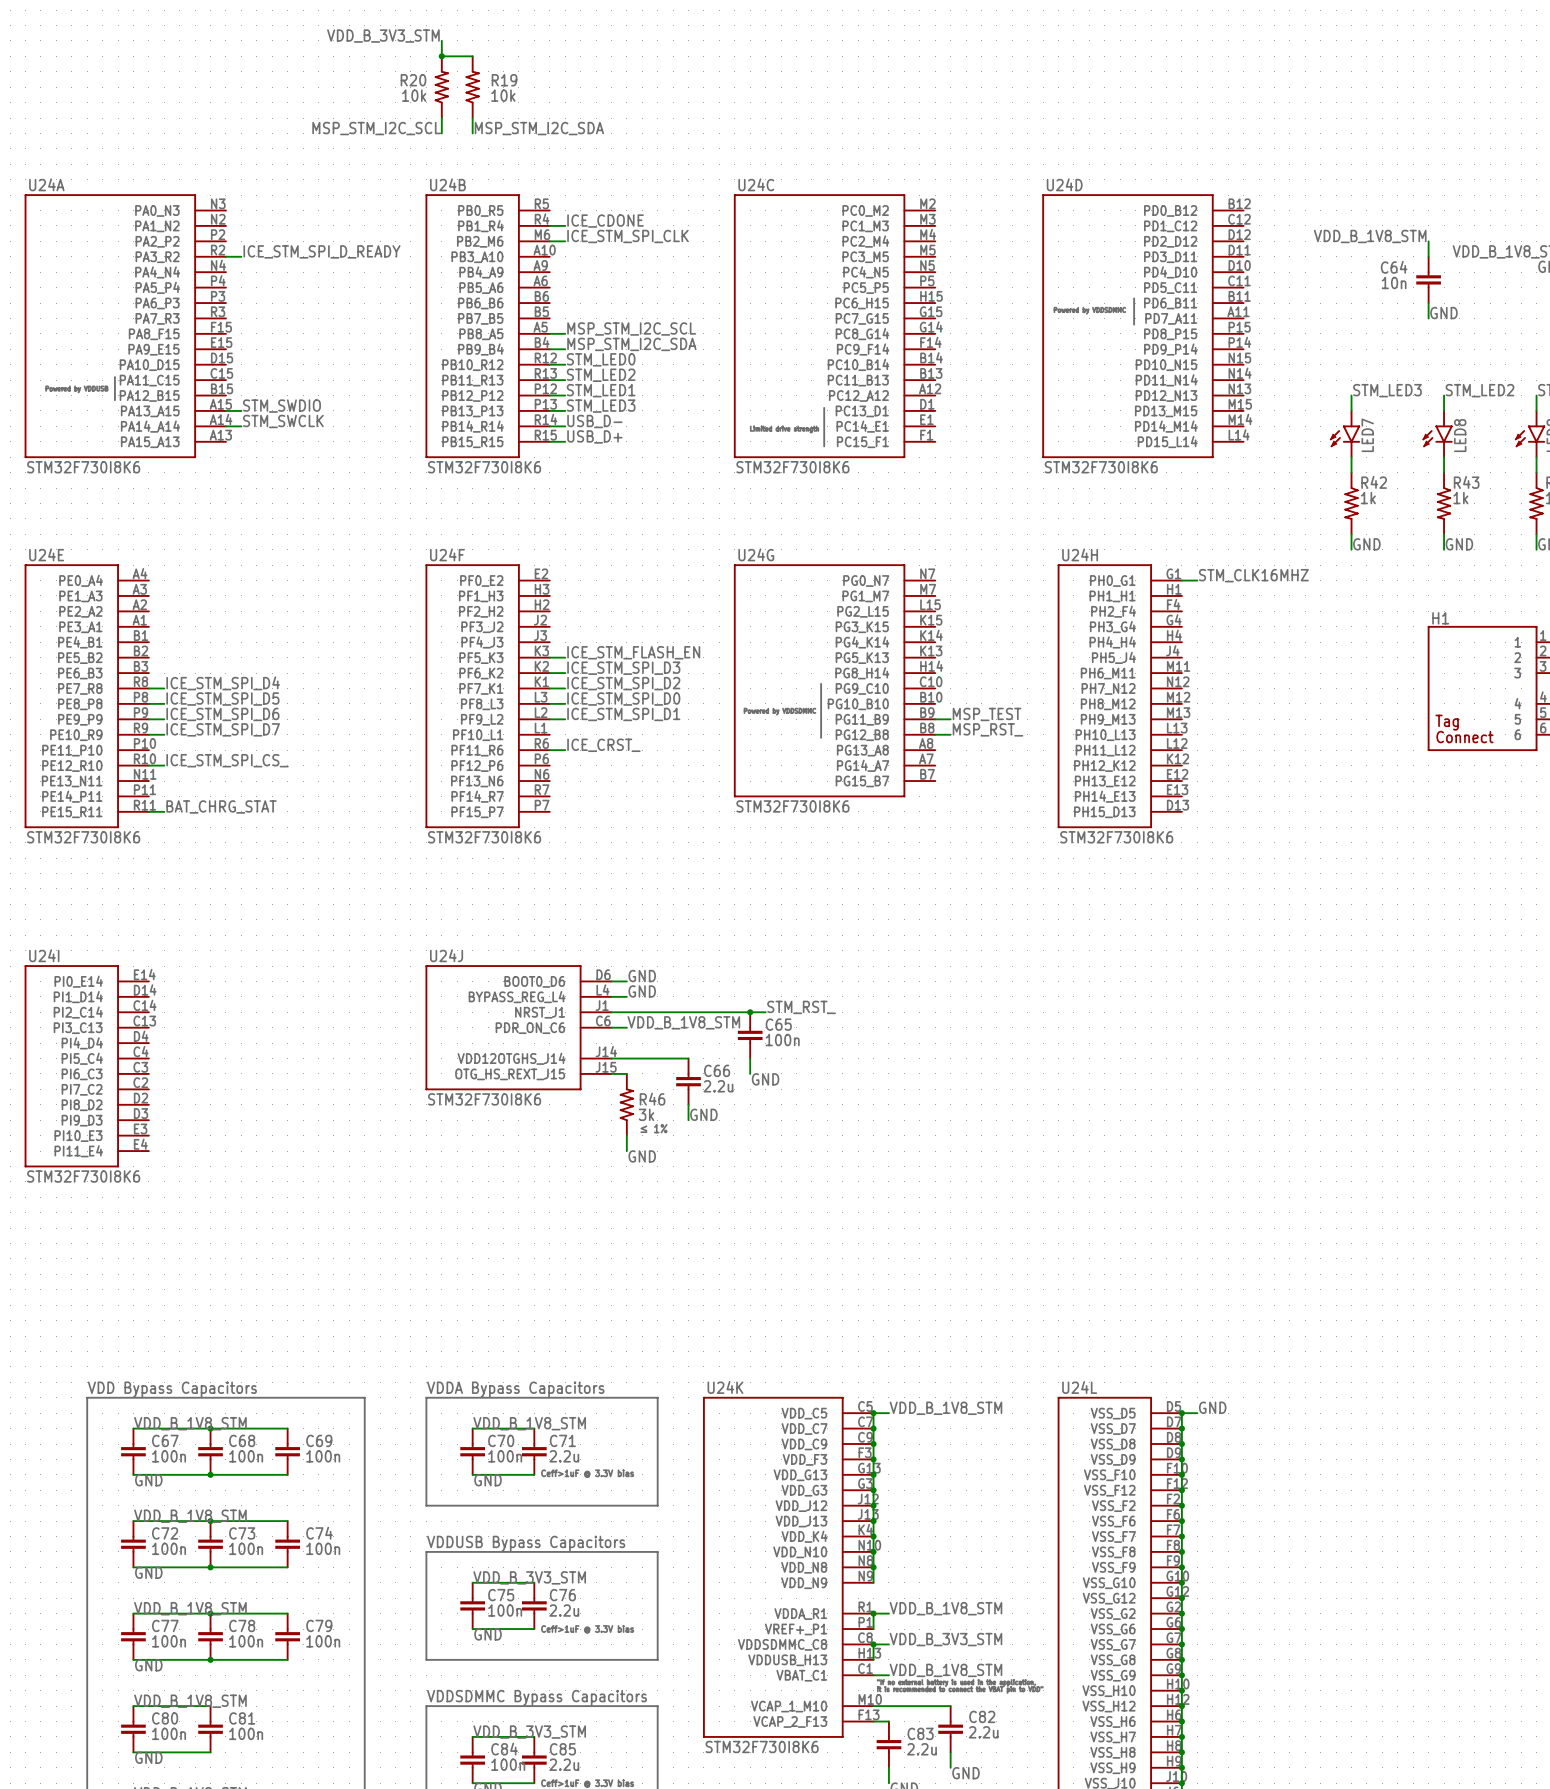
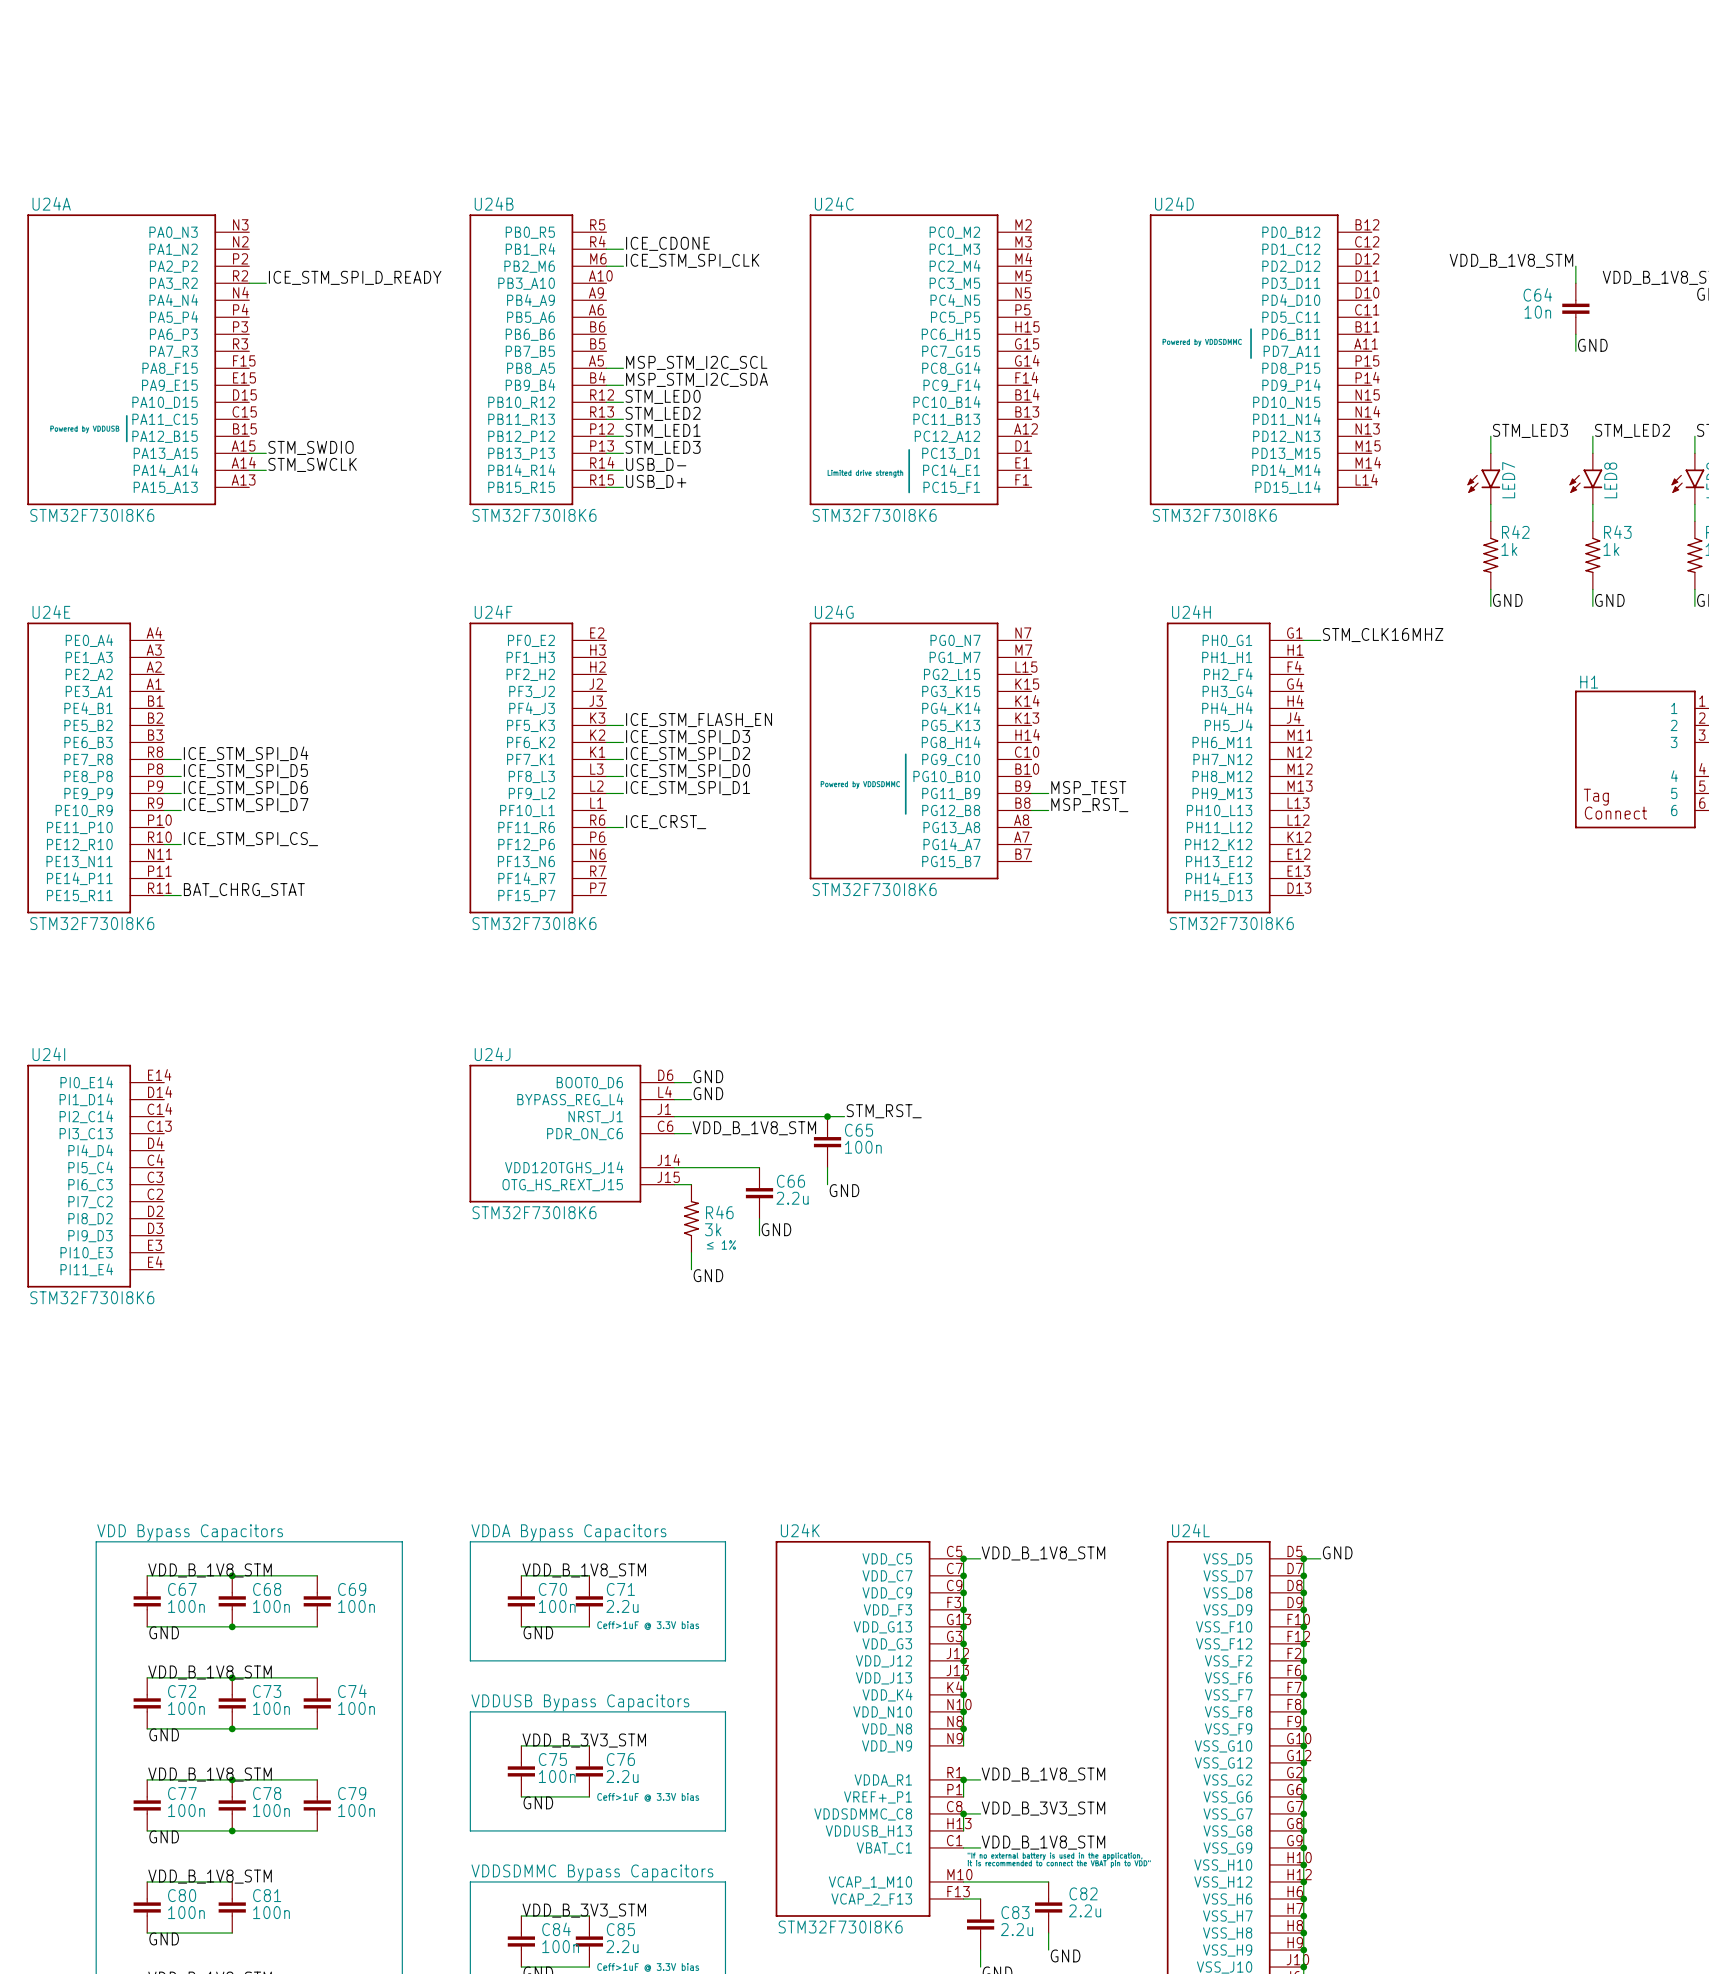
label: VDD_B_3V3_STM (383, 36) -> none
wire: (441, 40) (441, 56) (472, 56) -> none
junction: (441, 56) -> none
R20: 10k (441, 87) -> none
R19: 10k (472, 87) -> none
wire: (441, 118) (441, 133) -> none
wire: (472, 118) (472, 133) -> none
label: MSP_STM_I2C_SCL (376, 128) -> none
label: MSP_STM_I2C_SDA (539, 128) -> none

